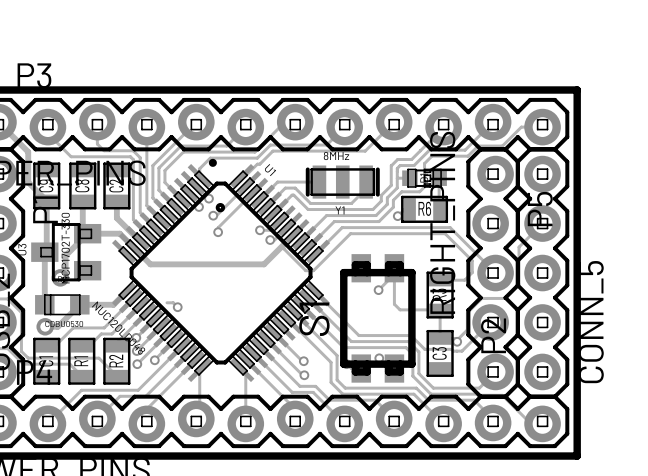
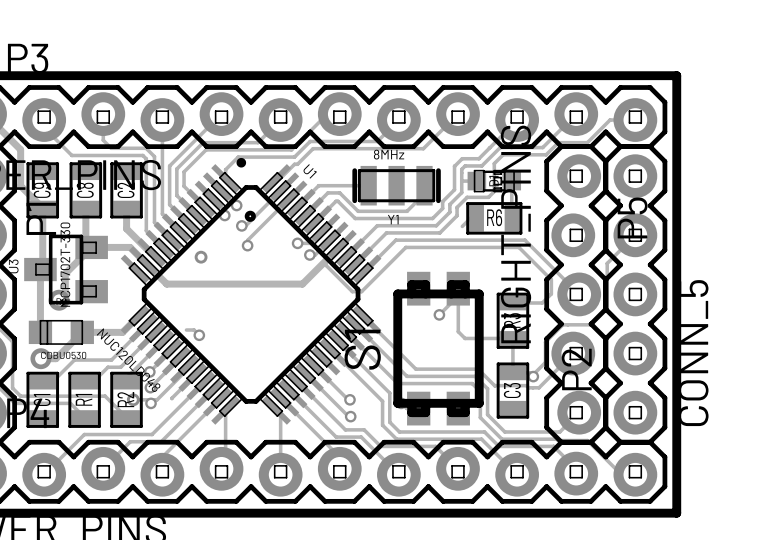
via: (397, 216) -> none
via: none -> (201, 257)
track: (165, 336) (137, 364) -> (184, 369) (184, 372) (157, 399) (133, 399)
via: (379, 358) -> none
via: (154, 360) -> none
via: none -> (133, 399)

